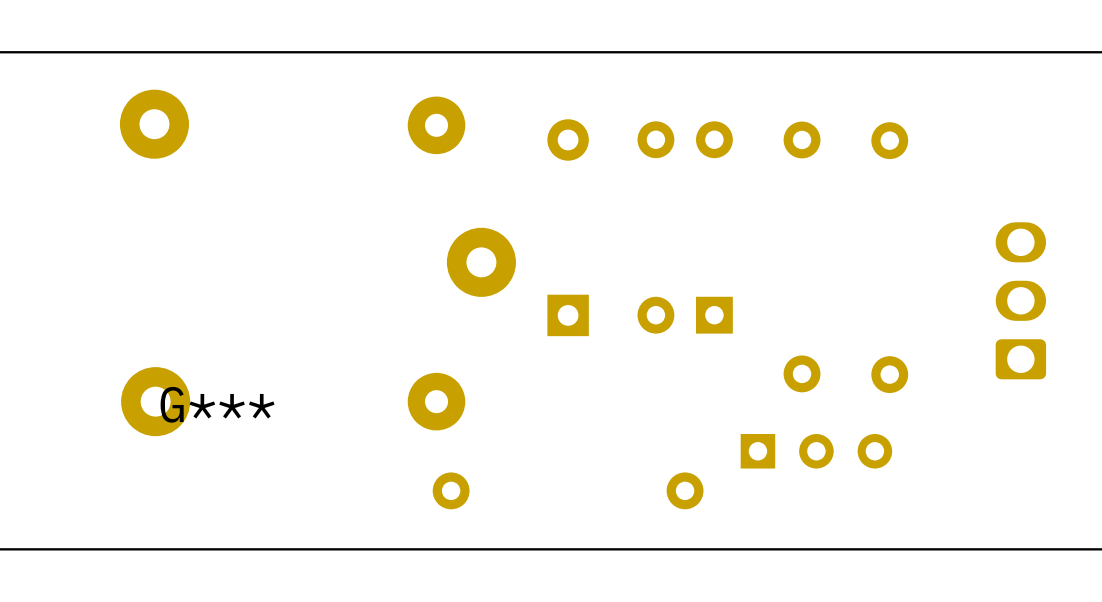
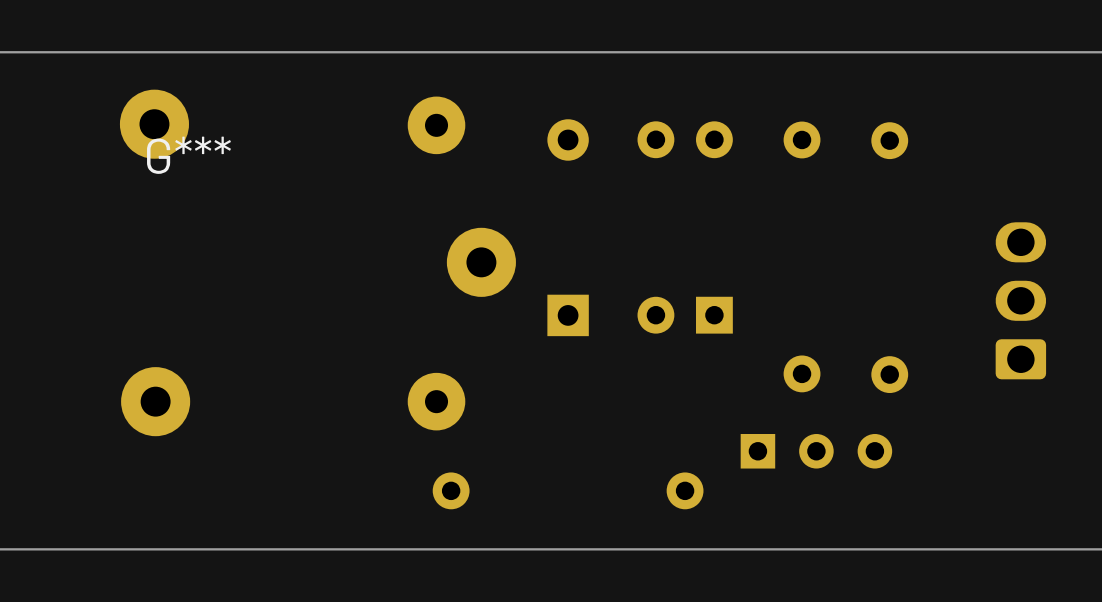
G*** position: (217, 404) -> (188, 155)

